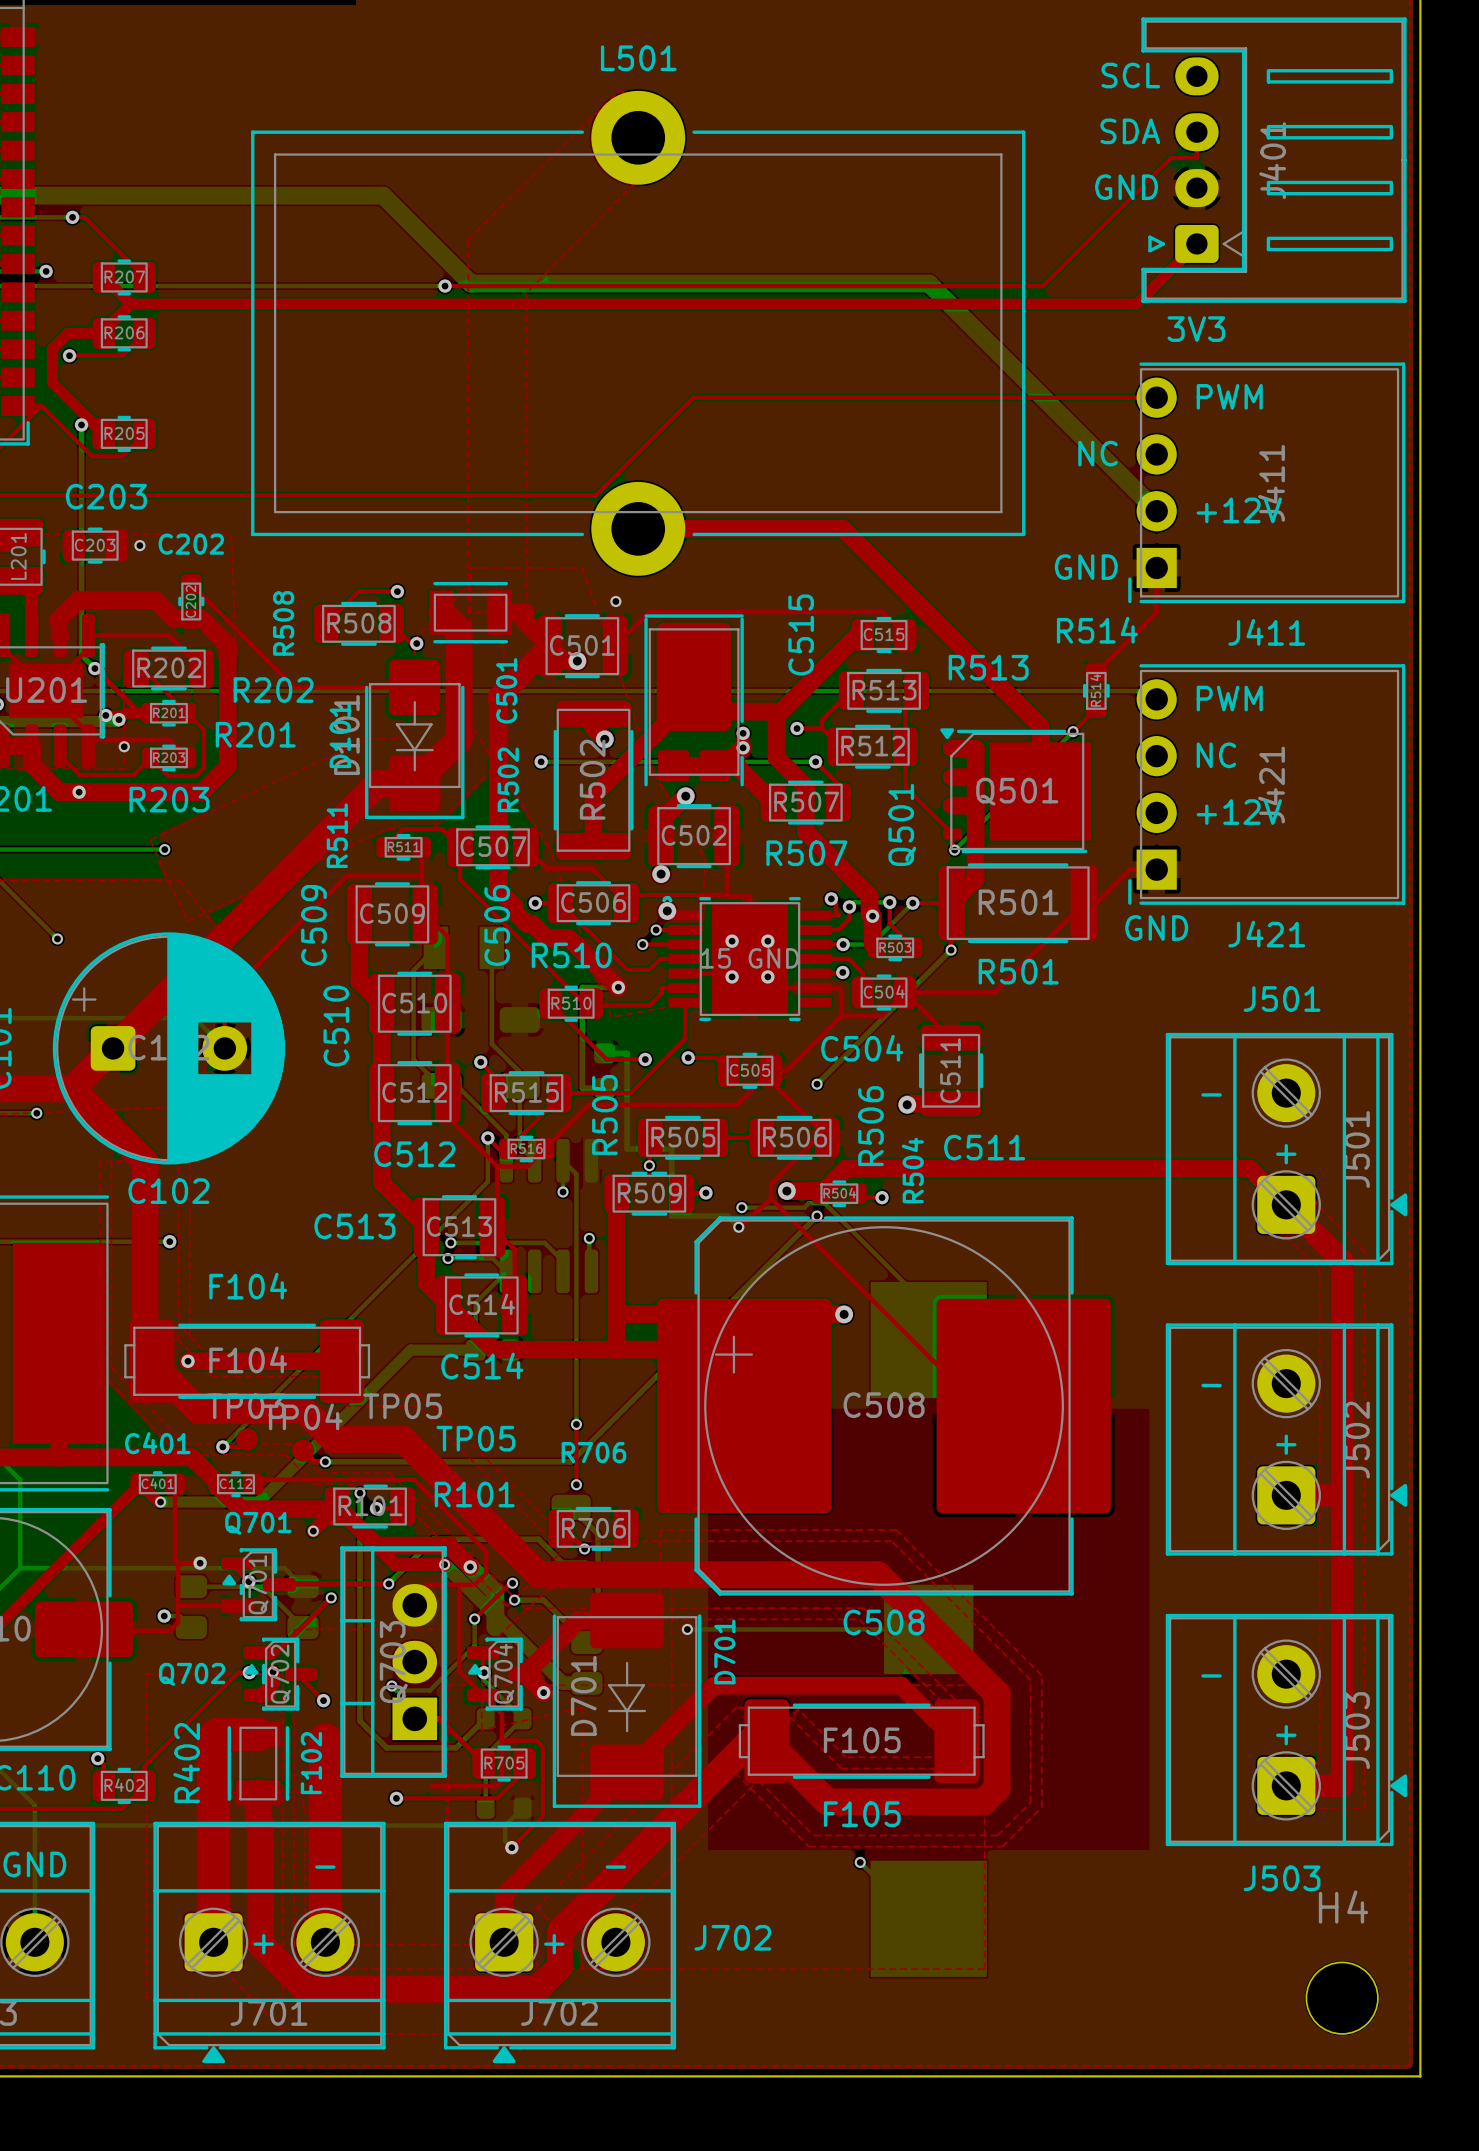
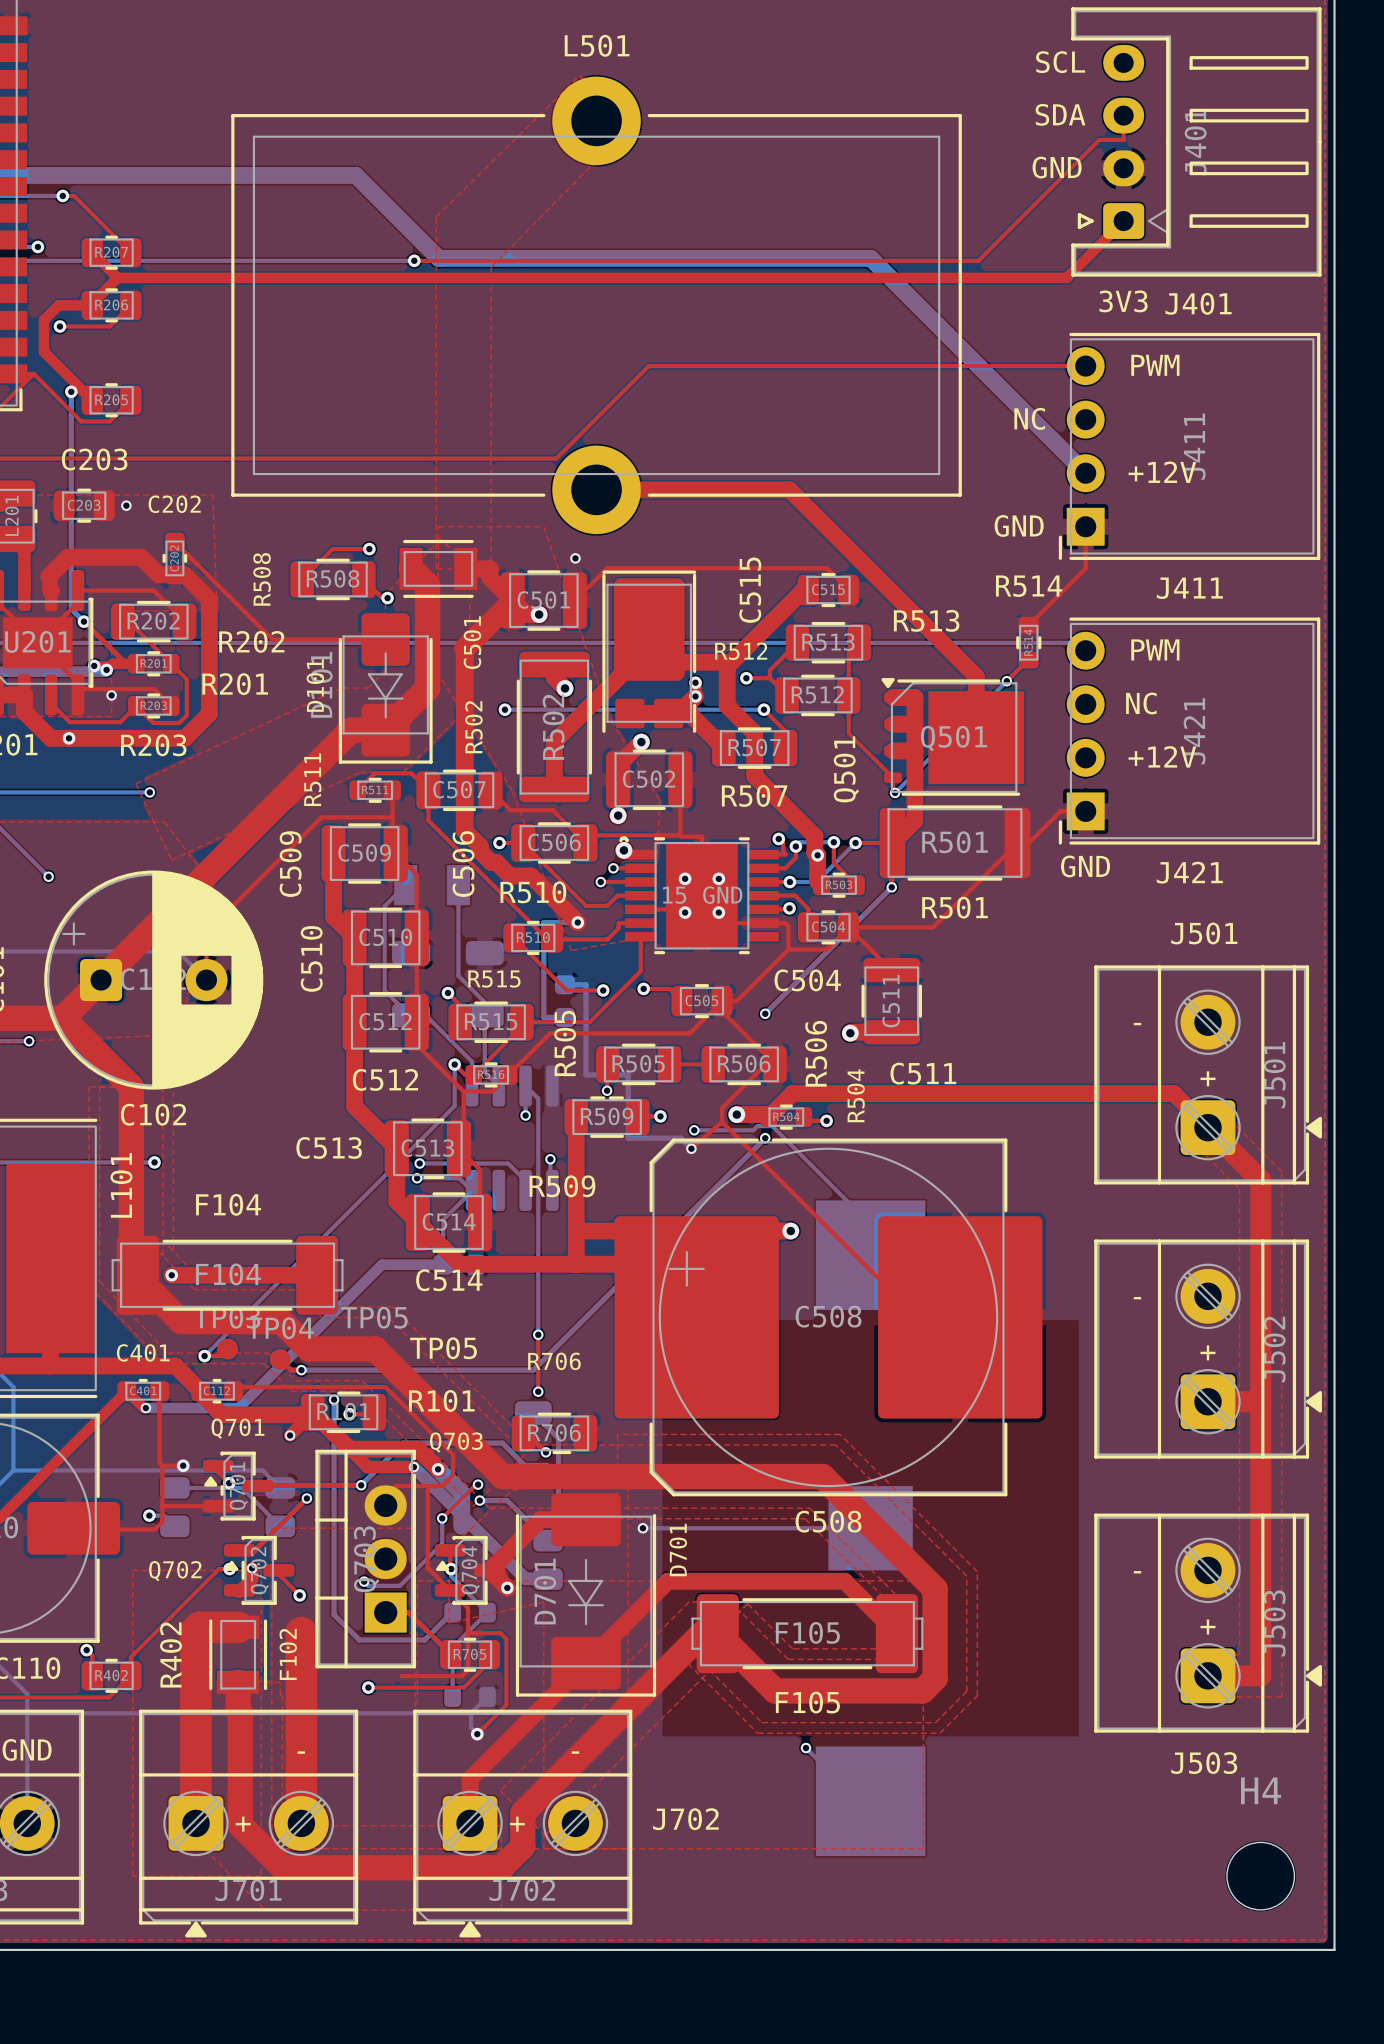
text: none -> J401 (1198, 303)
text: none -> R512 (741, 651)
text: none -> R515 (494, 979)
text: none -> L101 (121, 1185)
text: none -> R509 (562, 1186)
text: none -> Q703 (456, 1442)

